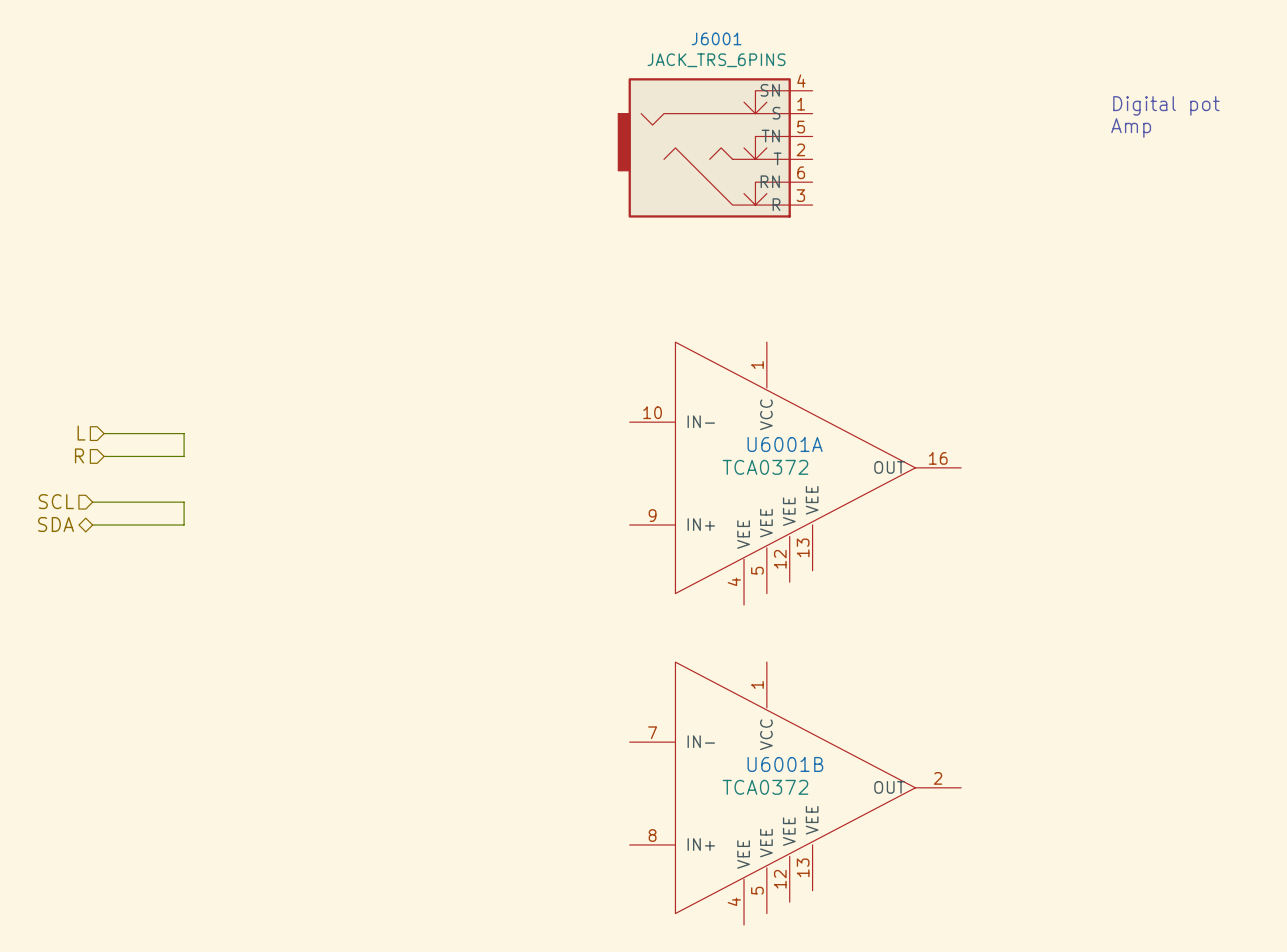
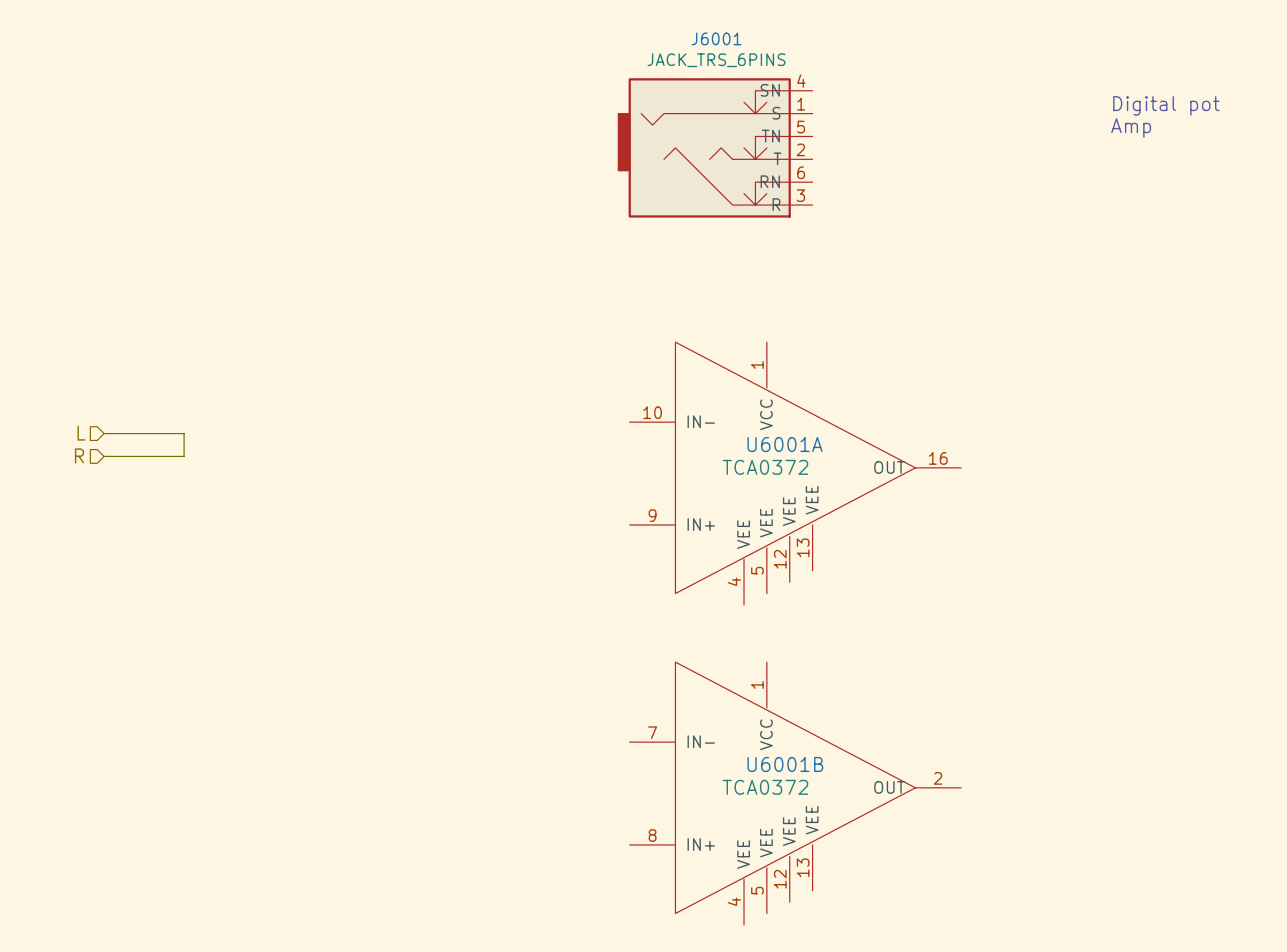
hierarchical label: SCL (56, 501) -> none
wire: (92, 502) (184, 502) (184, 525) (92, 525) -> none
hierarchical label: SDA (56, 524) -> none

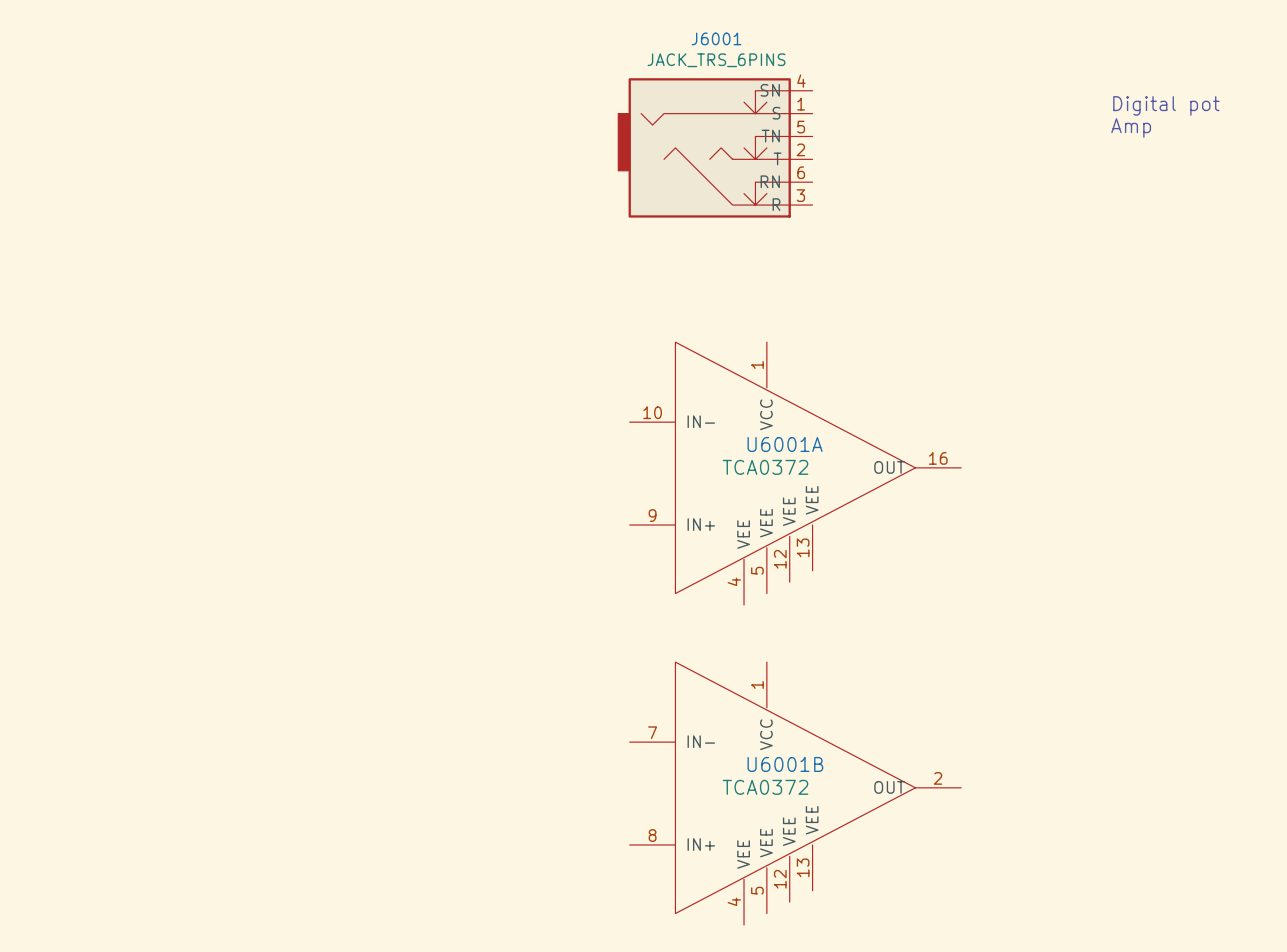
hierarchical label: L (81, 433) -> none
wire: (104, 433) (184, 433) (184, 456) (104, 456) -> none
hierarchical label: R (79, 455) -> none

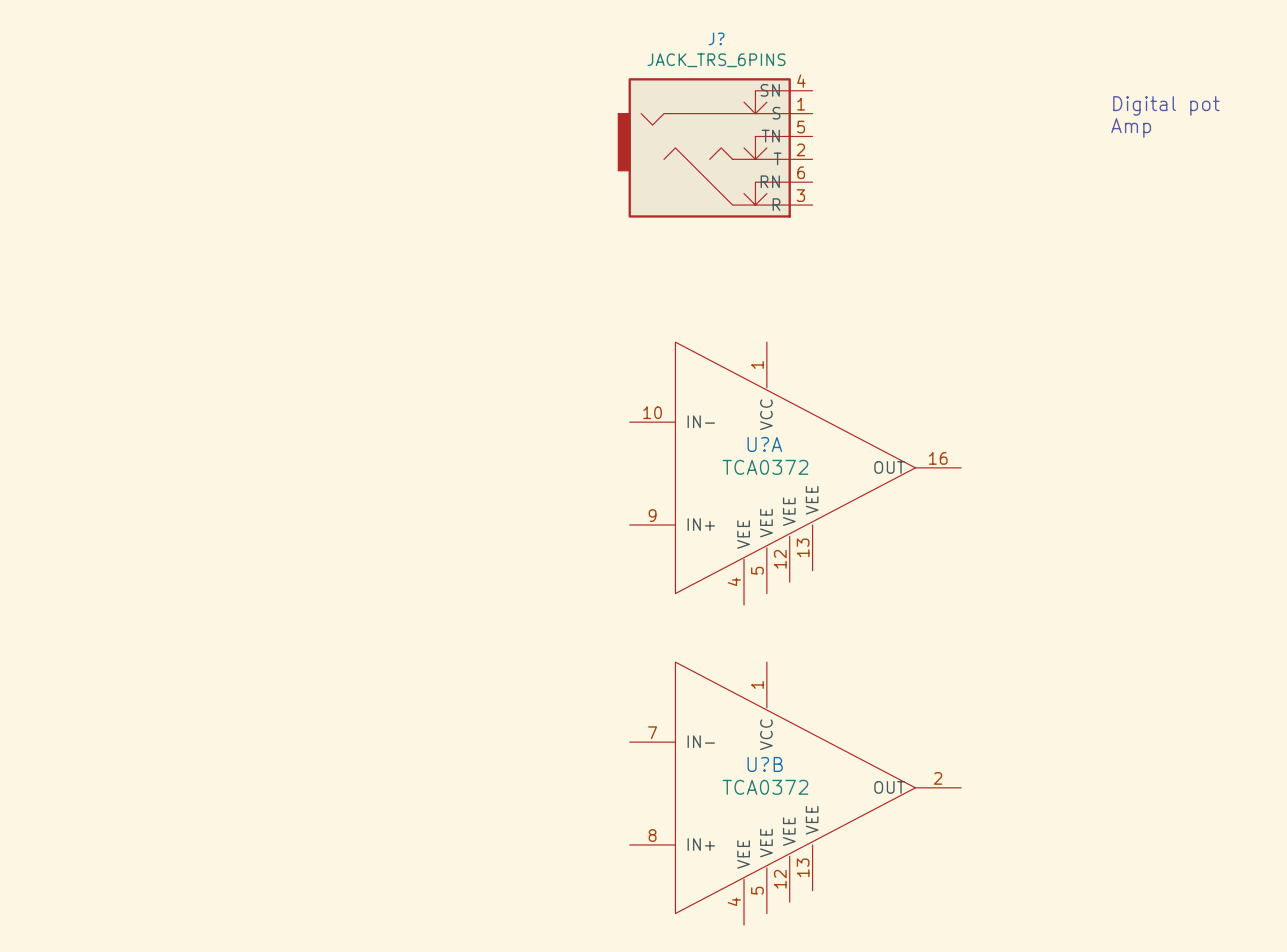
J6001 name: J6001 (716, 38) -> J? (716, 38)
U6001A name: U6001A (785, 444) -> U?A (764, 444)
U6001B name: U6001B (785, 764) -> U?B (765, 764)

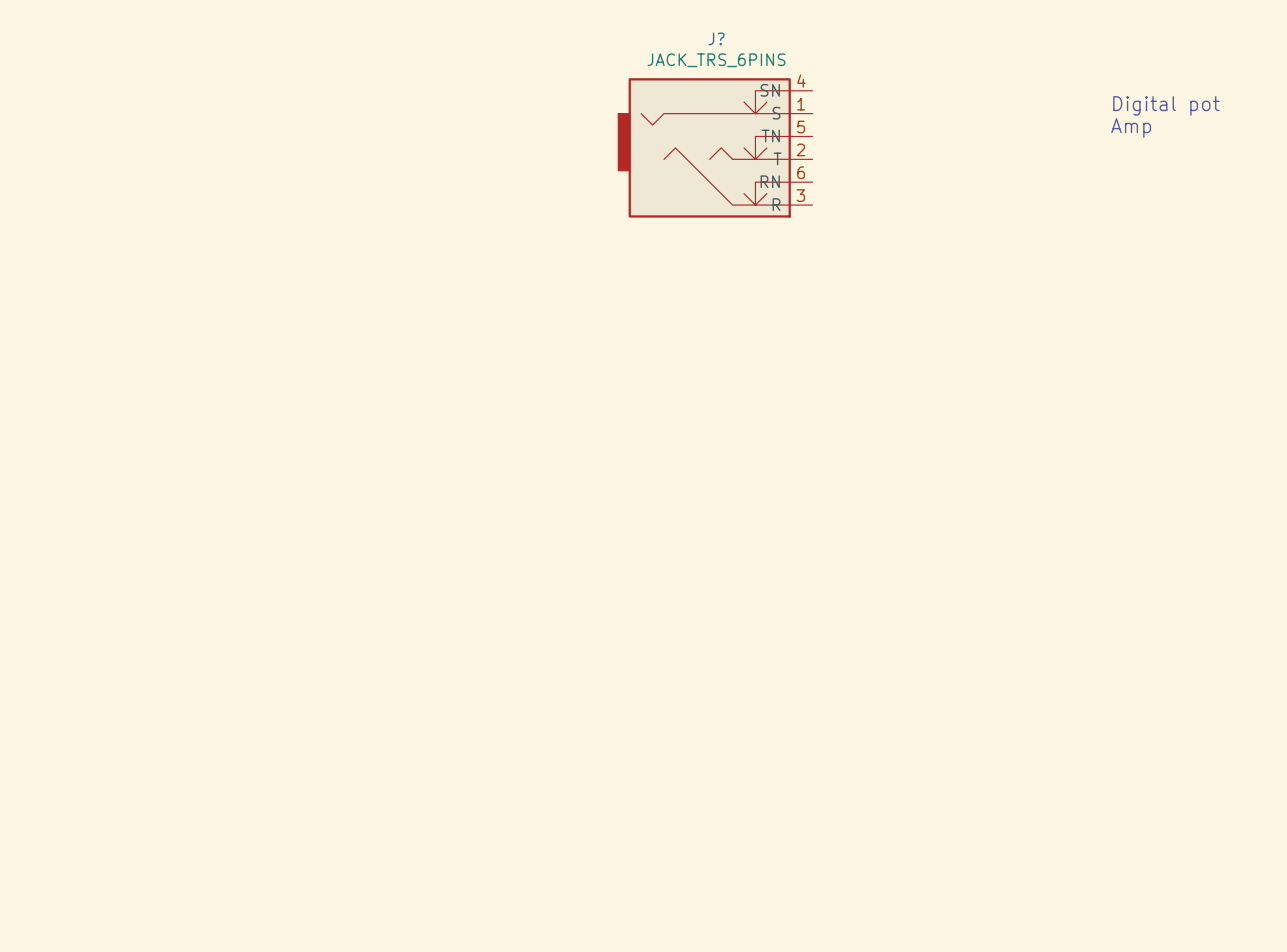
U?A: TCA0372 (795, 473) -> none
U?B: TCA0372 (795, 793) -> none

